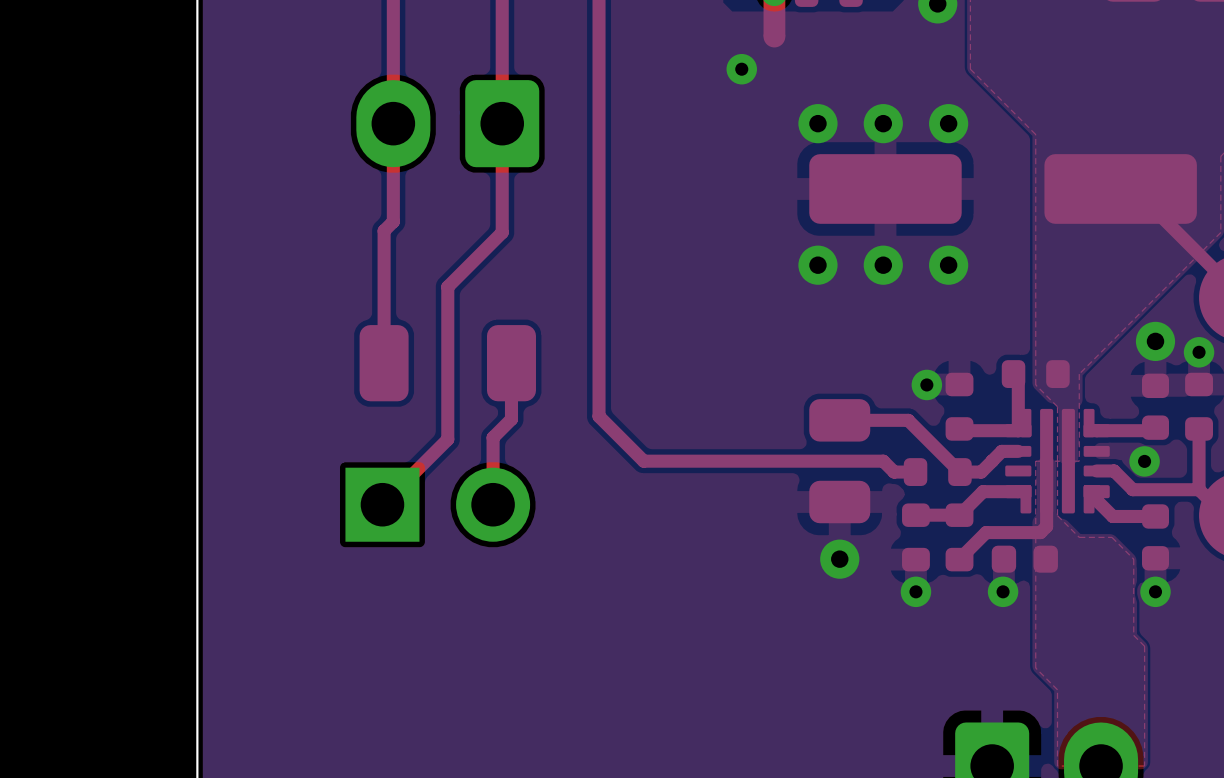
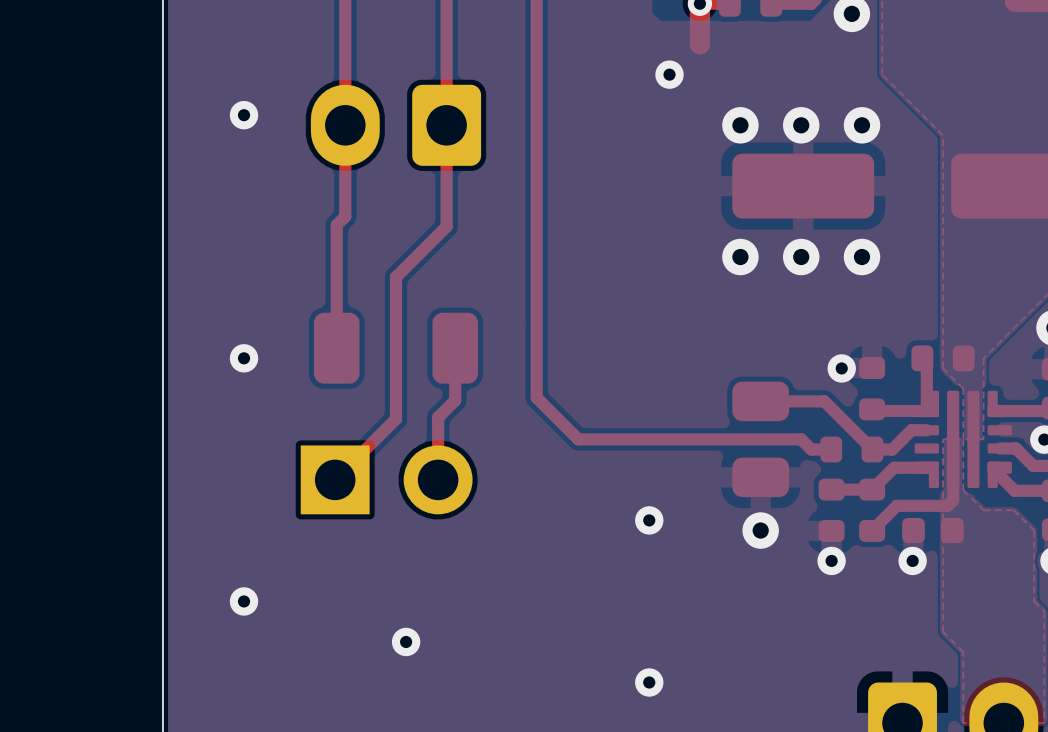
via: none -> (244, 115)
via: none -> (244, 358)
via: none -> (649, 520)
via: none -> (244, 601)
via: none -> (406, 641)
via: none -> (649, 682)

